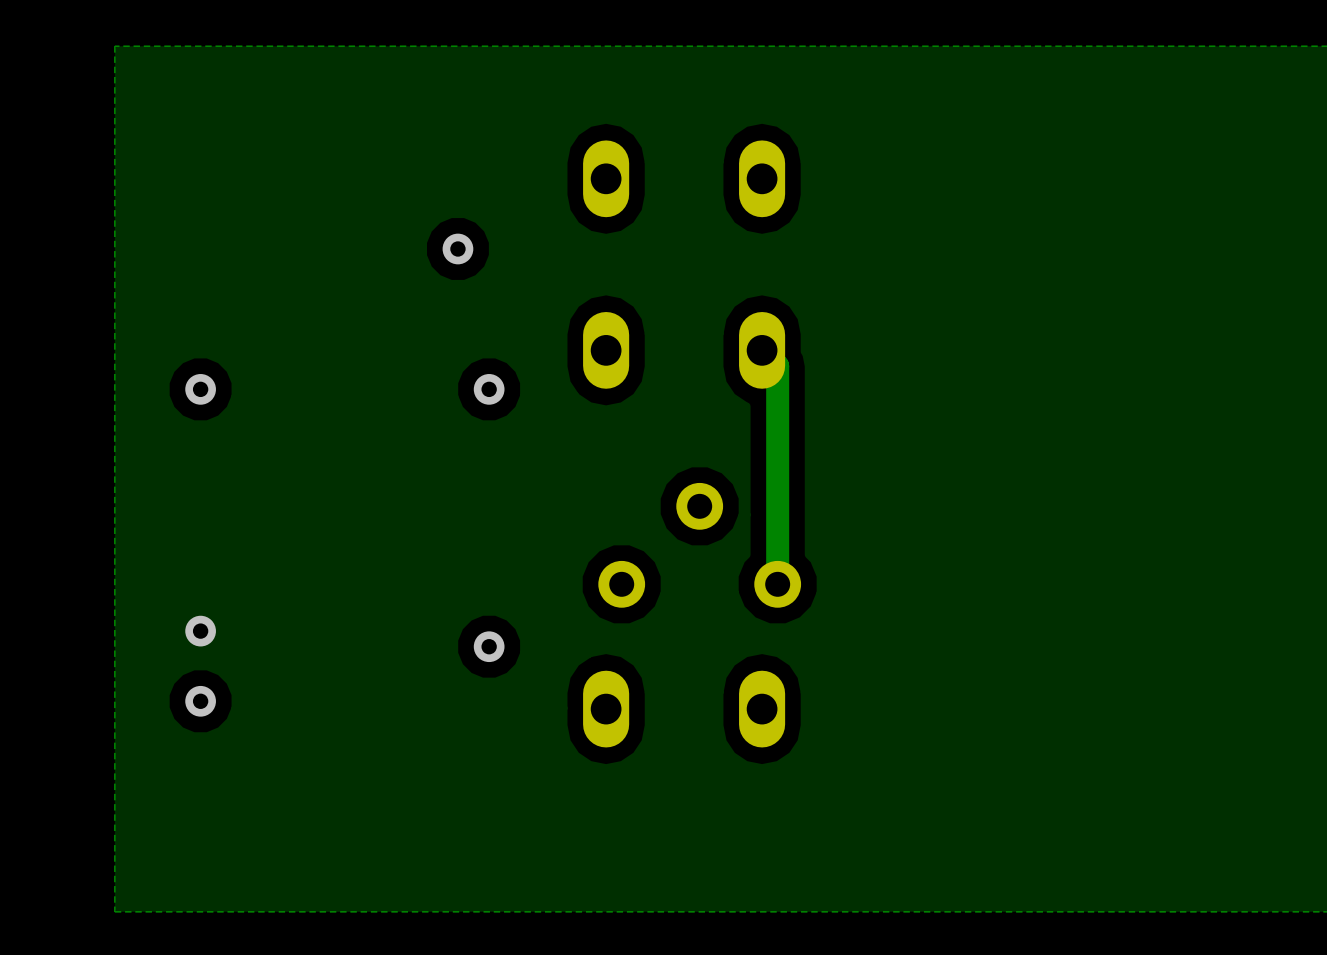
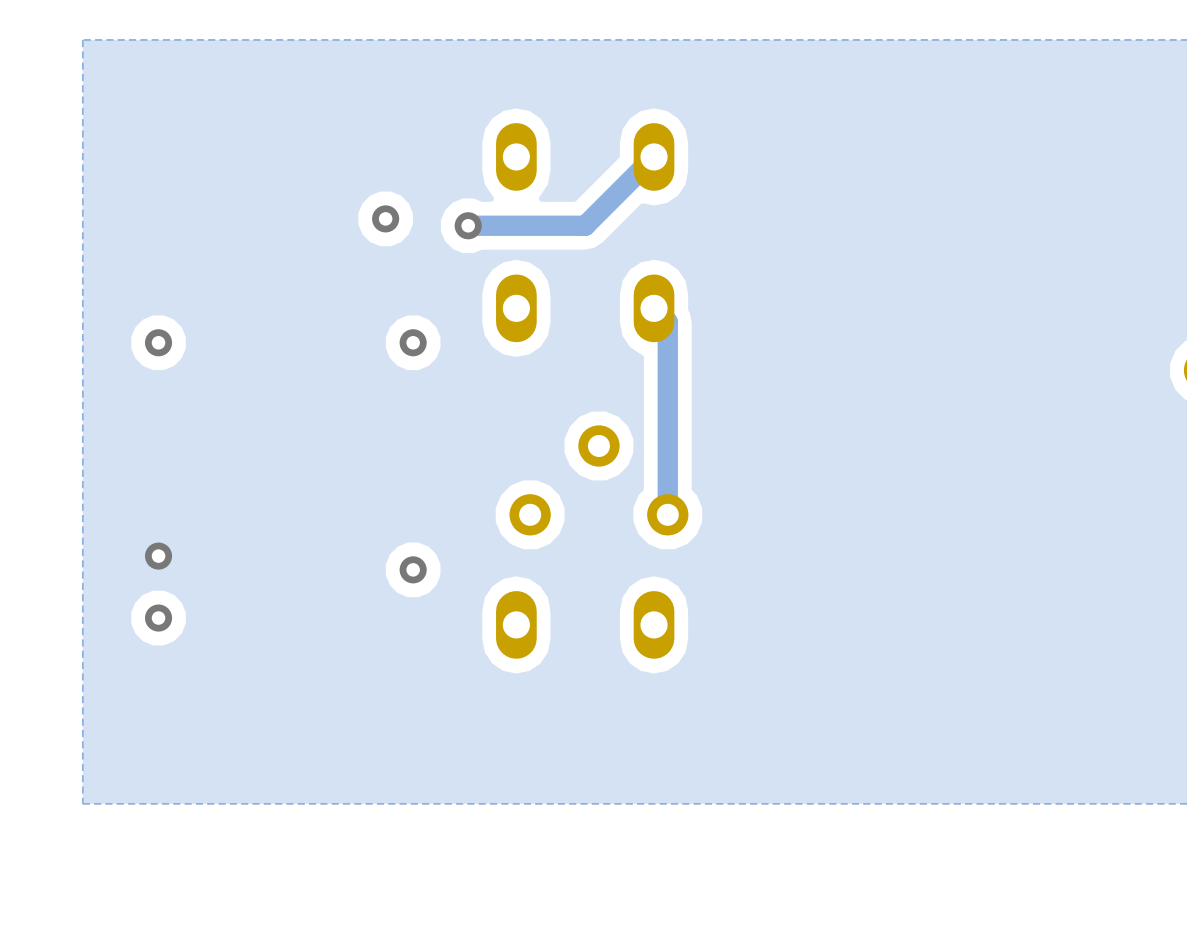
track: none -> (654, 156) (585, 225) (468, 225)
via: none -> (468, 225)

